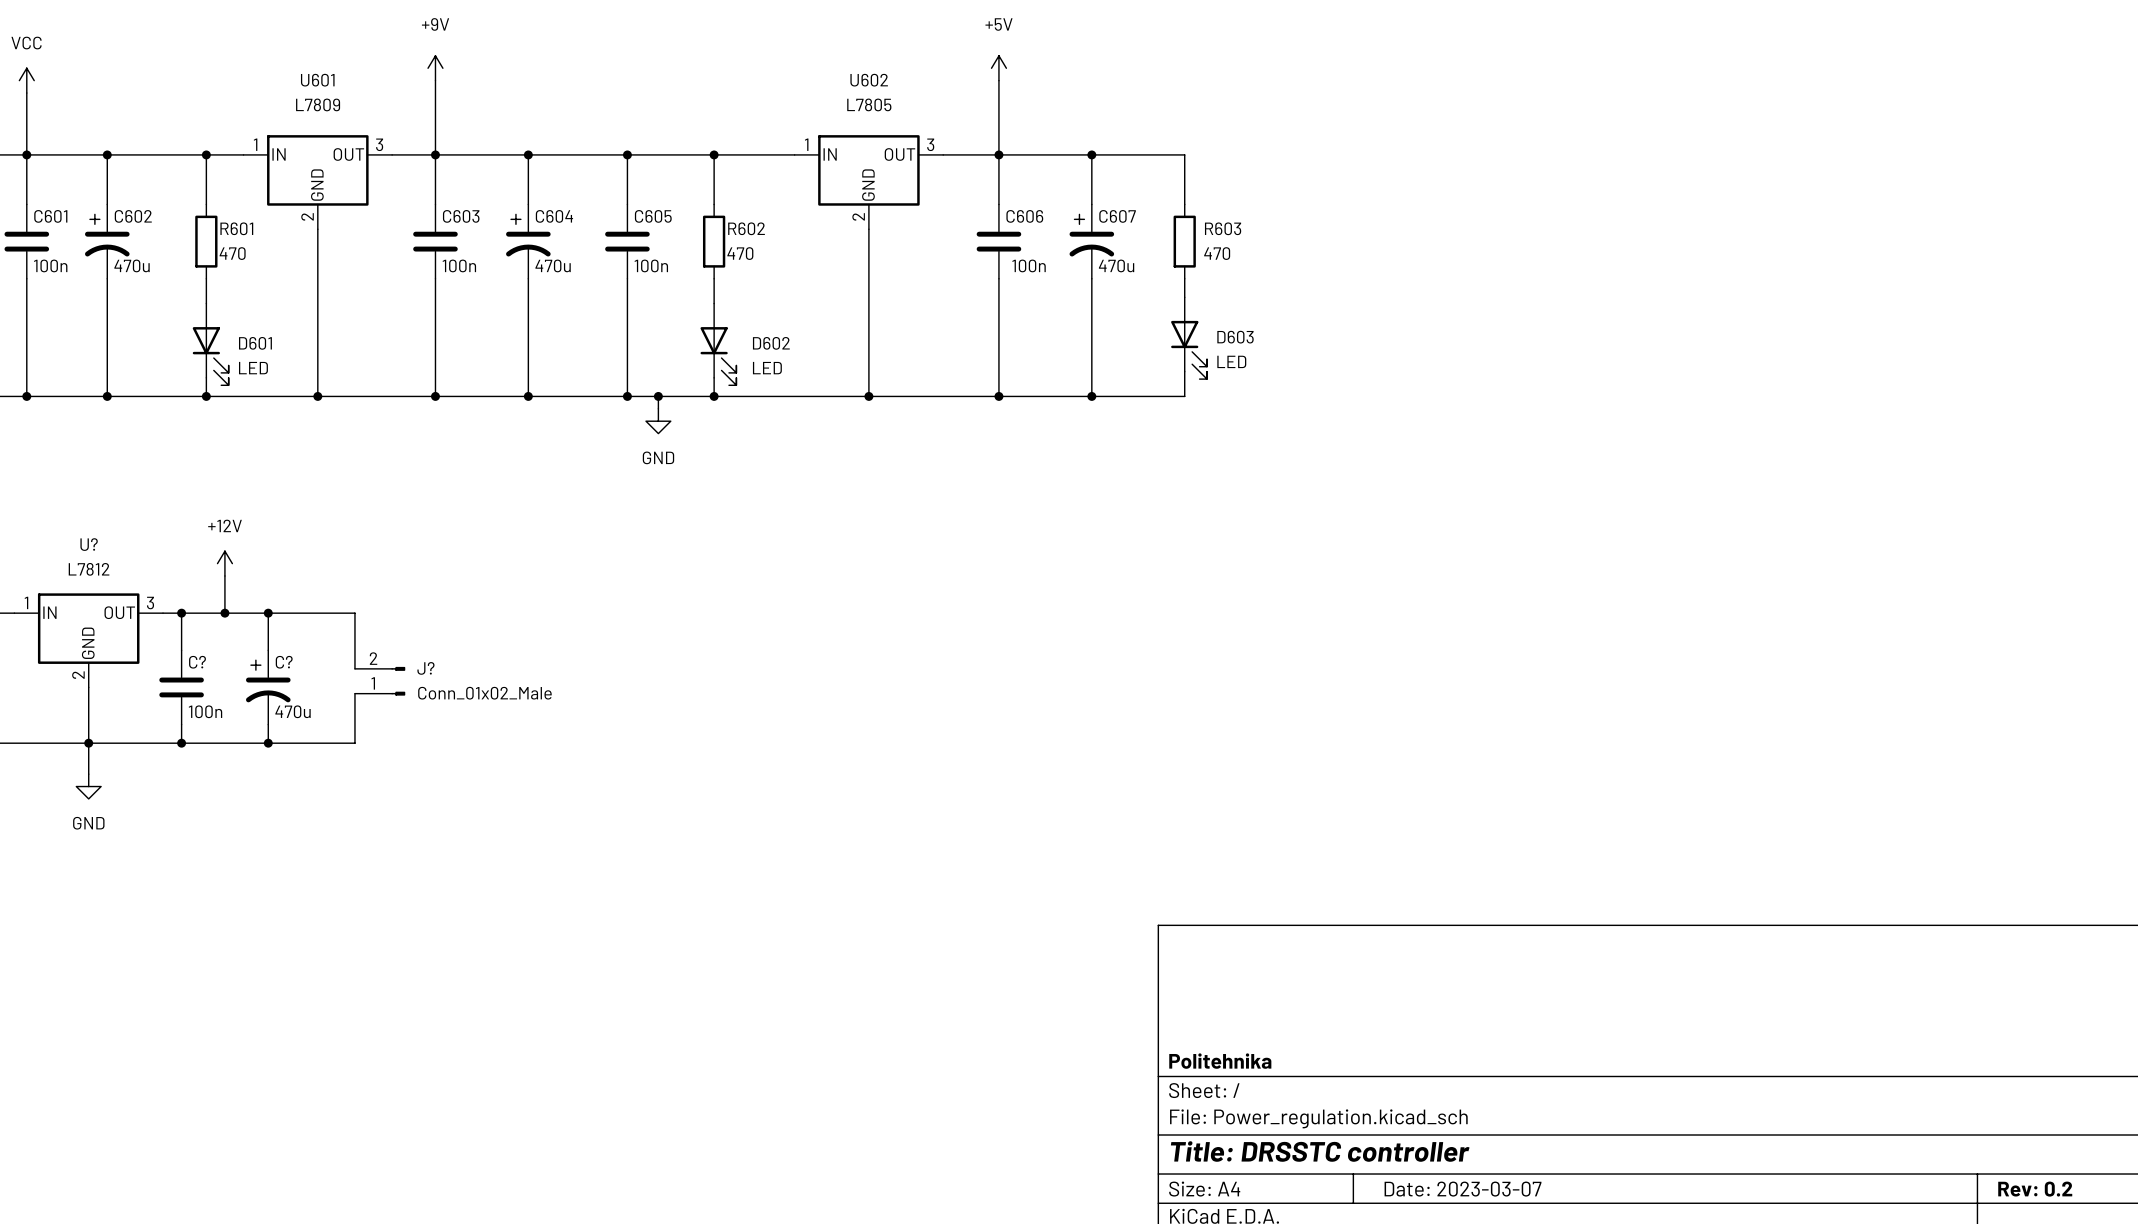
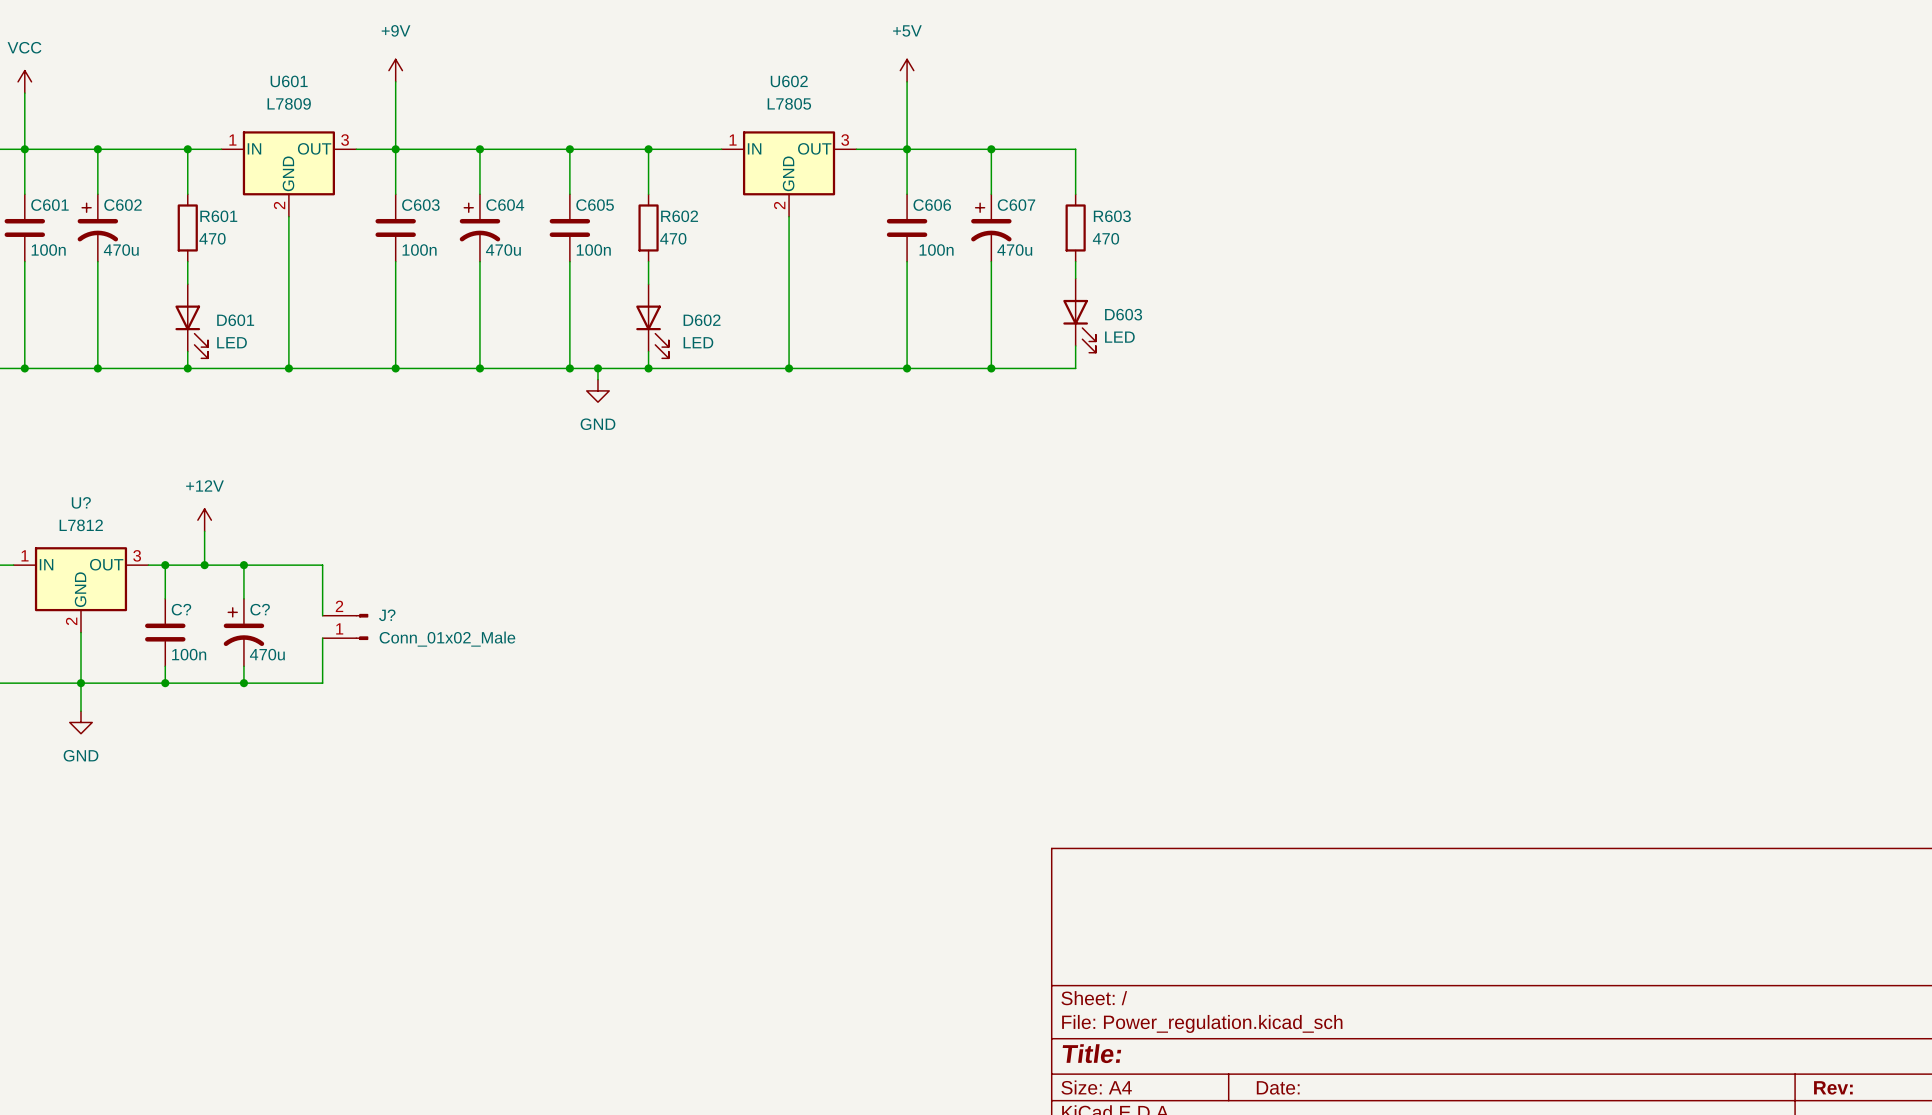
title block: Politehnika (1220, 1061) -> none
title block: Title: DRSSTC controller (1320, 1151) -> Title: (1091, 1053)
title block: Date: 2023-03-07 (1463, 1189) -> Date: (1278, 1087)
title block: Rev: 0.2 (2035, 1189) -> Rev: (1833, 1087)

